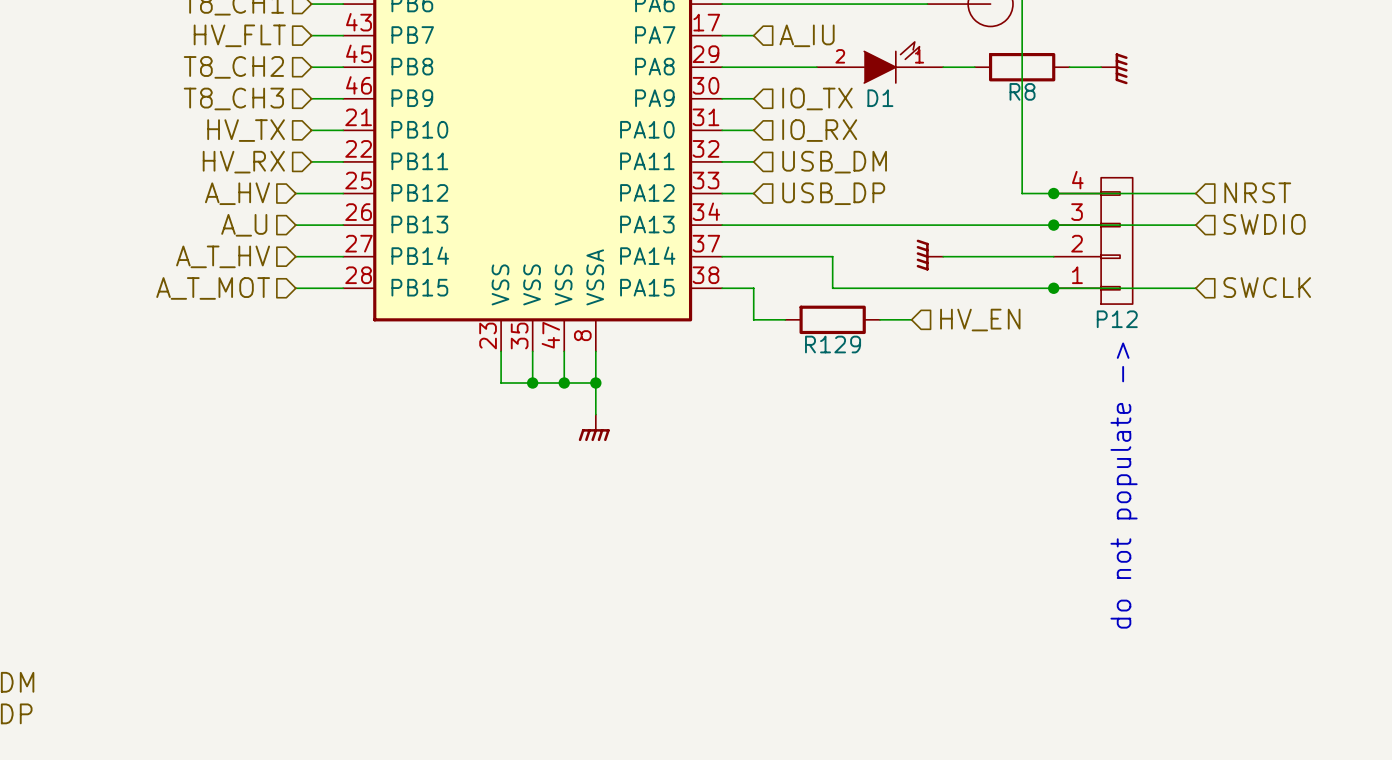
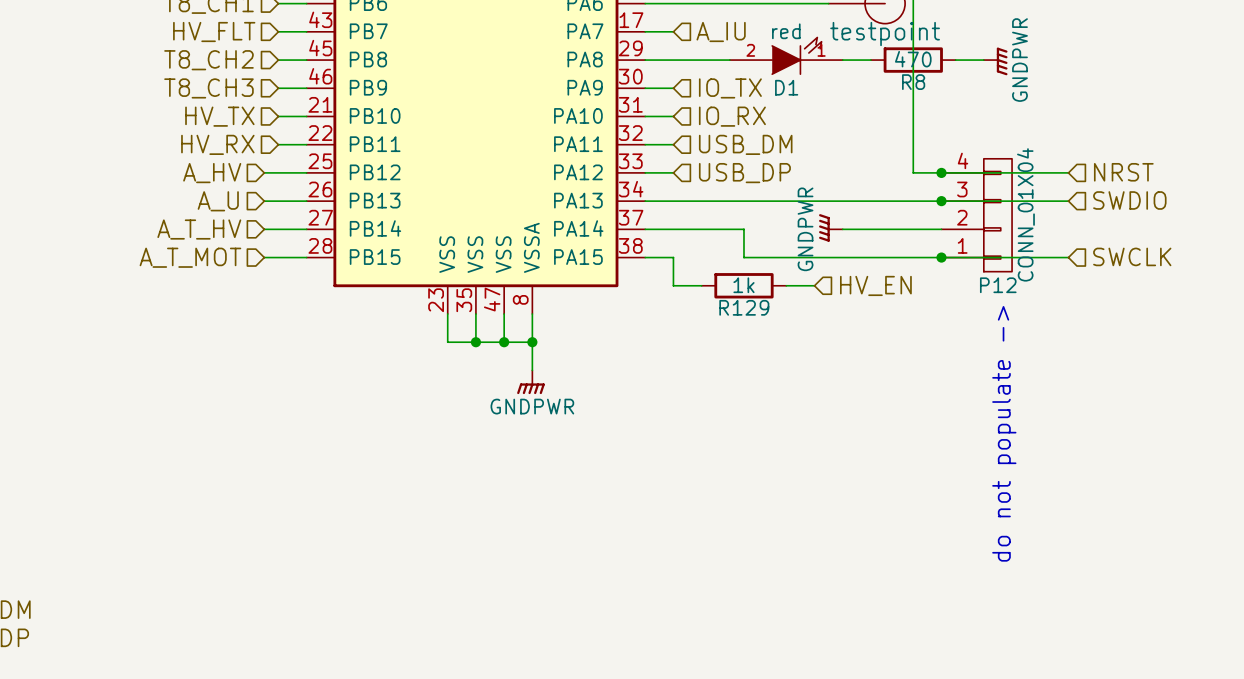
D1 value: none -> red (786, 31)
part value: none -> testpoint (885, 34)
R8 value: none -> 470 (913, 59)
power symbol text: none -> GNDPWR (1019, 60)
P12 value: none -> CONN_01X04 (1025, 214)
power symbol text: none -> GNDPWR (805, 229)
R129 value: none -> 1k (743, 285)
power symbol text: none -> GNDPWR (532, 406)

